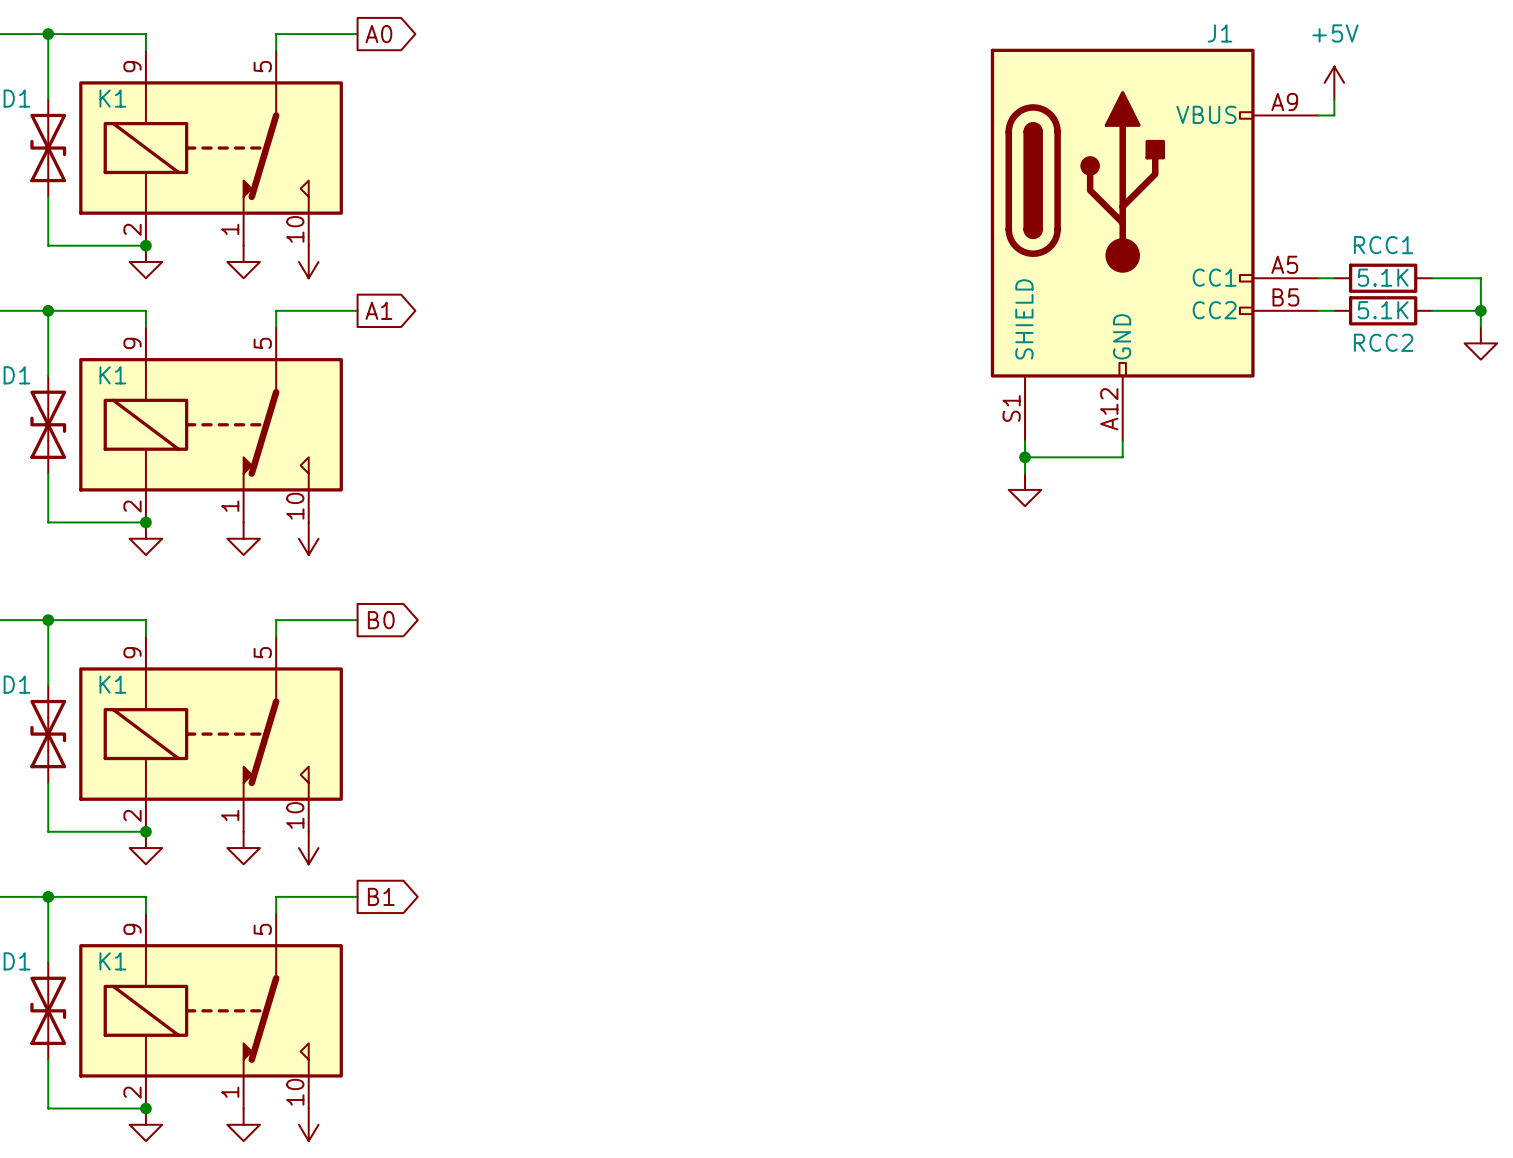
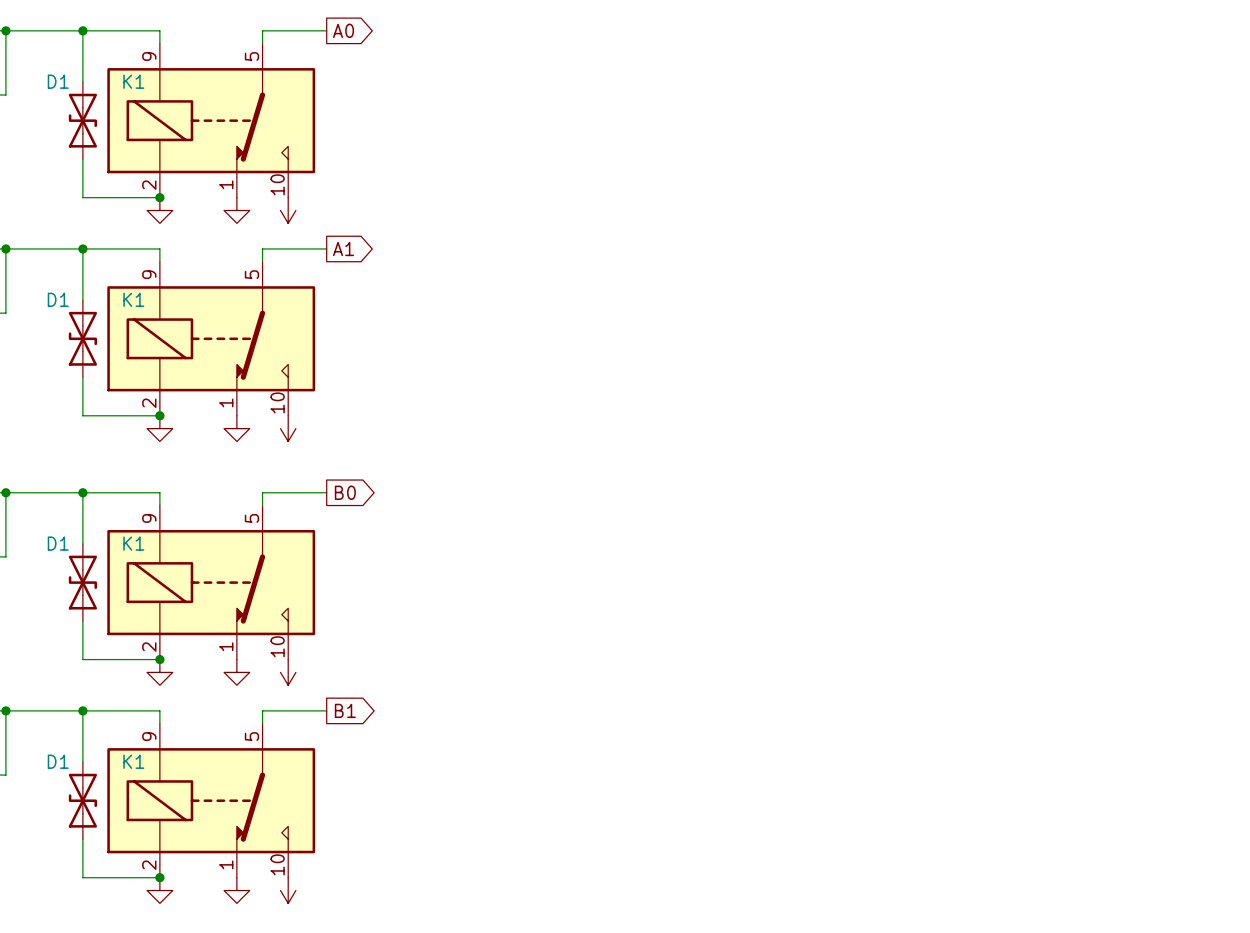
power symbol: +5V (1334, 82) -> none
wire: (1334, 99) (1334, 115) (1318, 115) -> none
J1: (1154, 244) -> none
wire: (1318, 278) (1334, 278) -> none
RCC1: 5.1K (1383, 278) -> none
wire: (1432, 278) (1480, 278) (1480, 327) -> none
wire: (1318, 310) (1334, 310) -> none
RCC2: 5.1K (1383, 310) -> none
wire: (1432, 310) (1480, 310) -> none
junction: (1480, 310) -> none
power symbol: (1480, 343) -> none
wire: (1025, 441) (1025, 473) -> none
wire: (1122, 441) (1122, 457) (1025, 457) -> none
junction: (1025, 457) -> none
power symbol: (1025, 489) -> none

